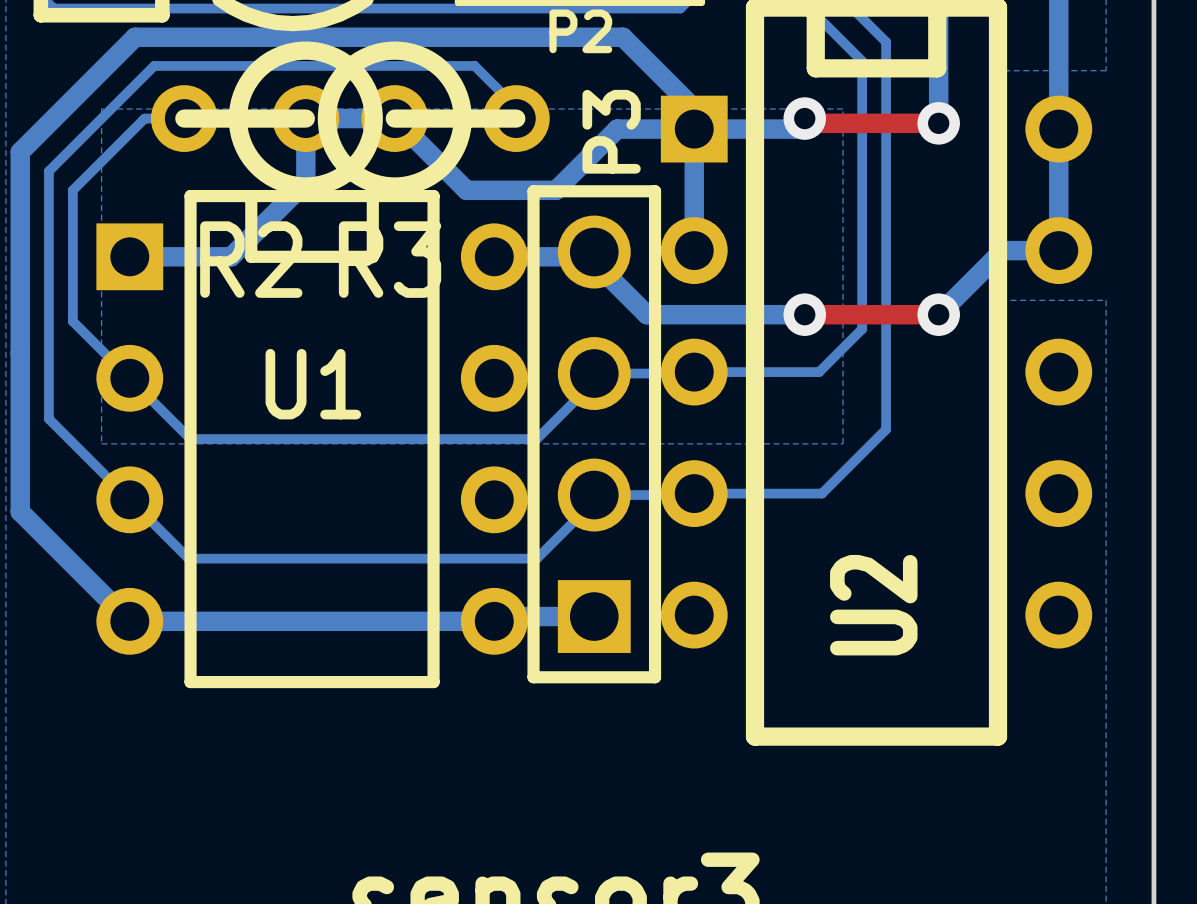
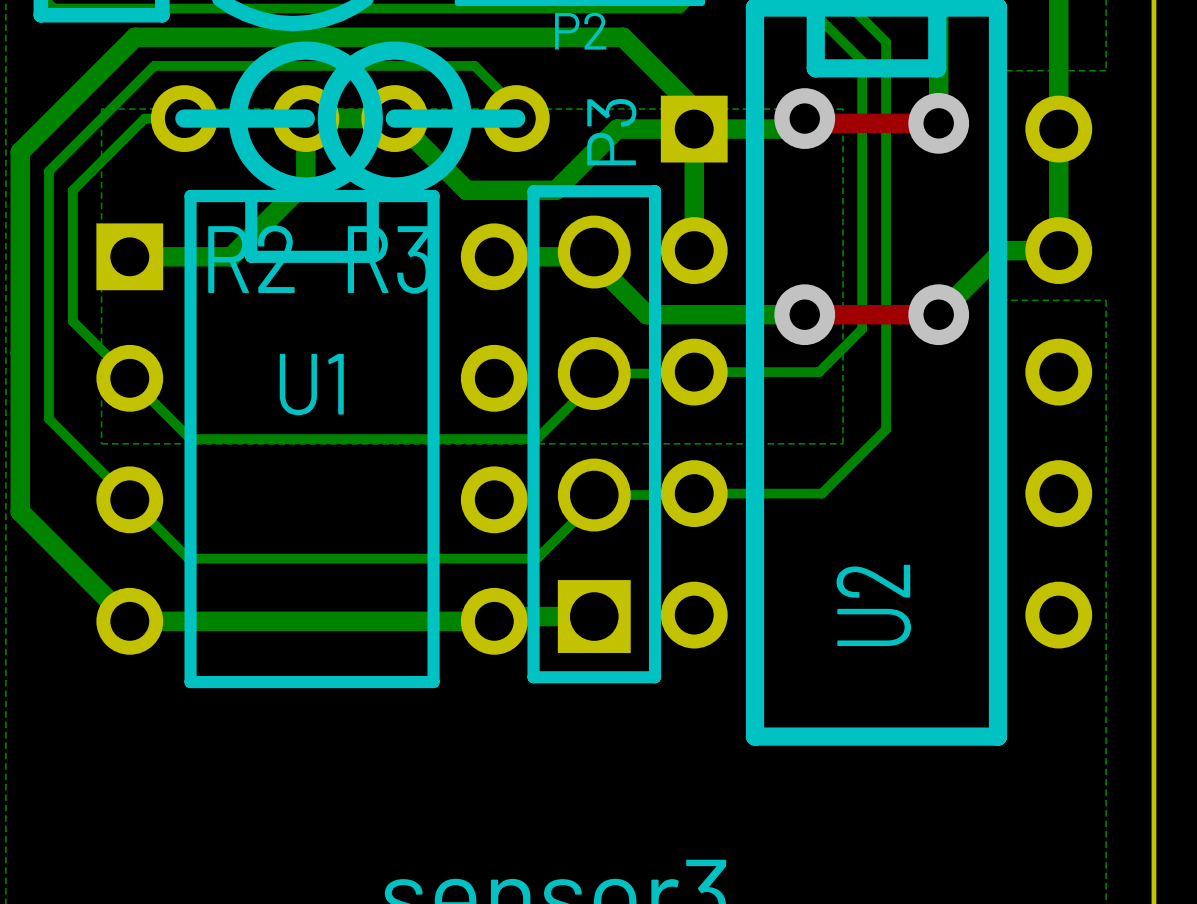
via size: [783, 97, 827, 140] -> [774, 88, 836, 149]
via size: [917, 102, 960, 145] -> [908, 92, 970, 154]
via size: [783, 293, 827, 336] -> [774, 284, 836, 346]
via size: [917, 293, 960, 336] -> [908, 284, 970, 346]

